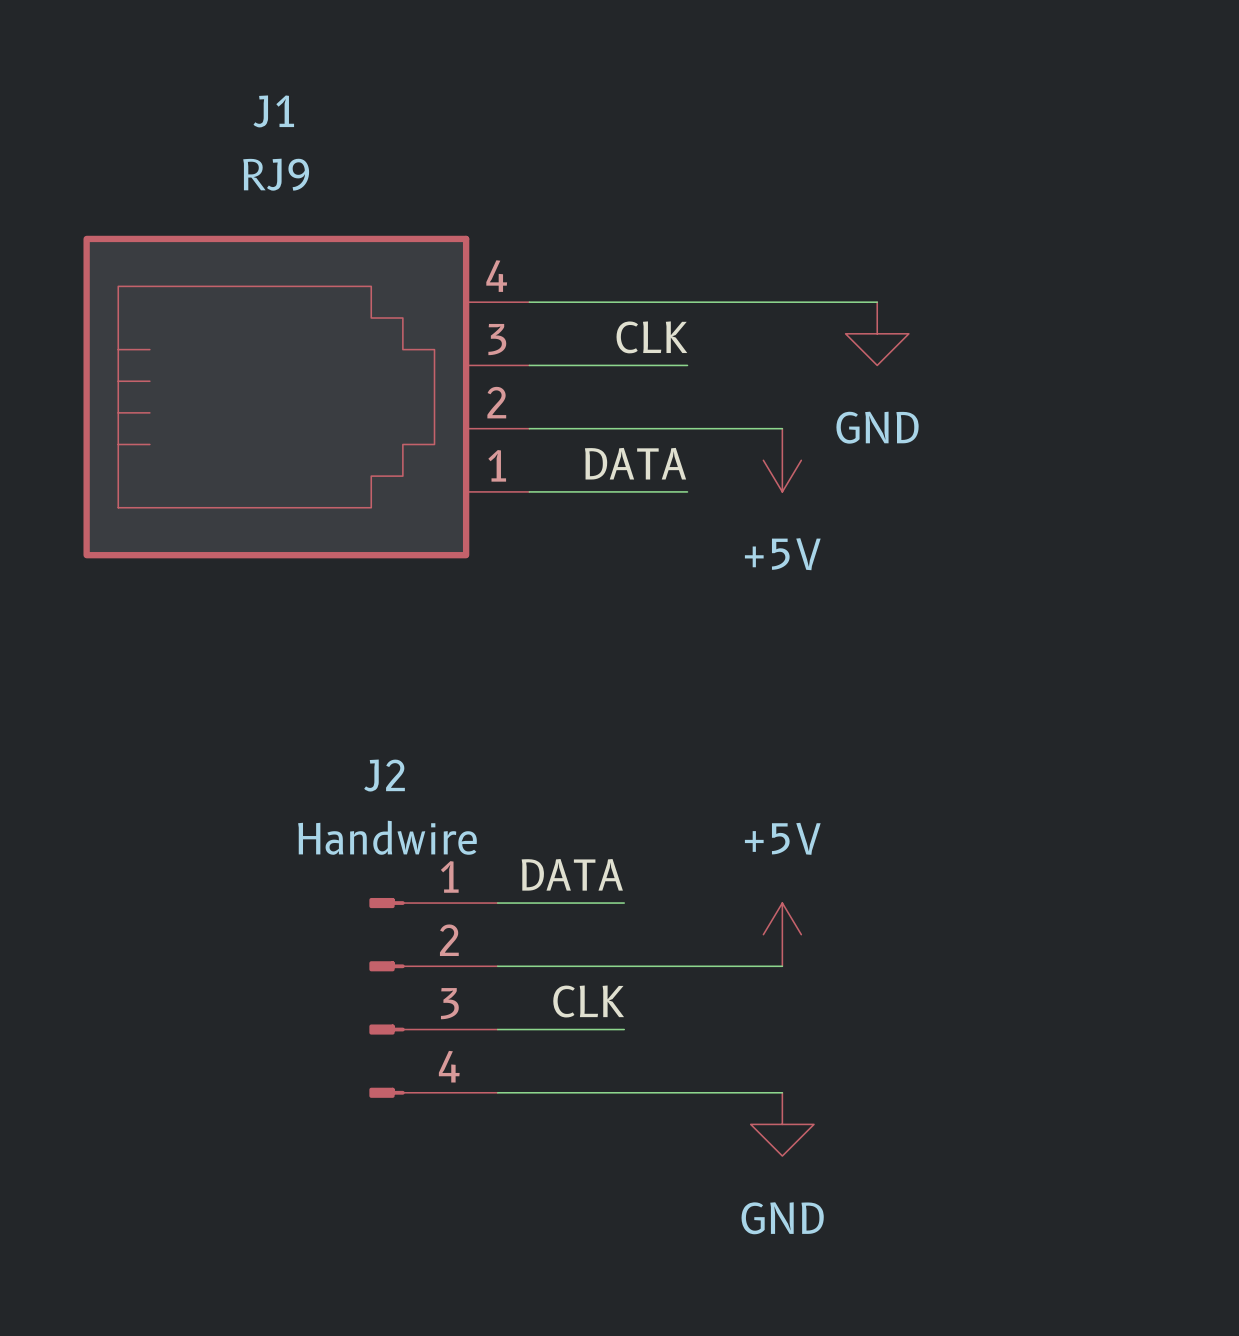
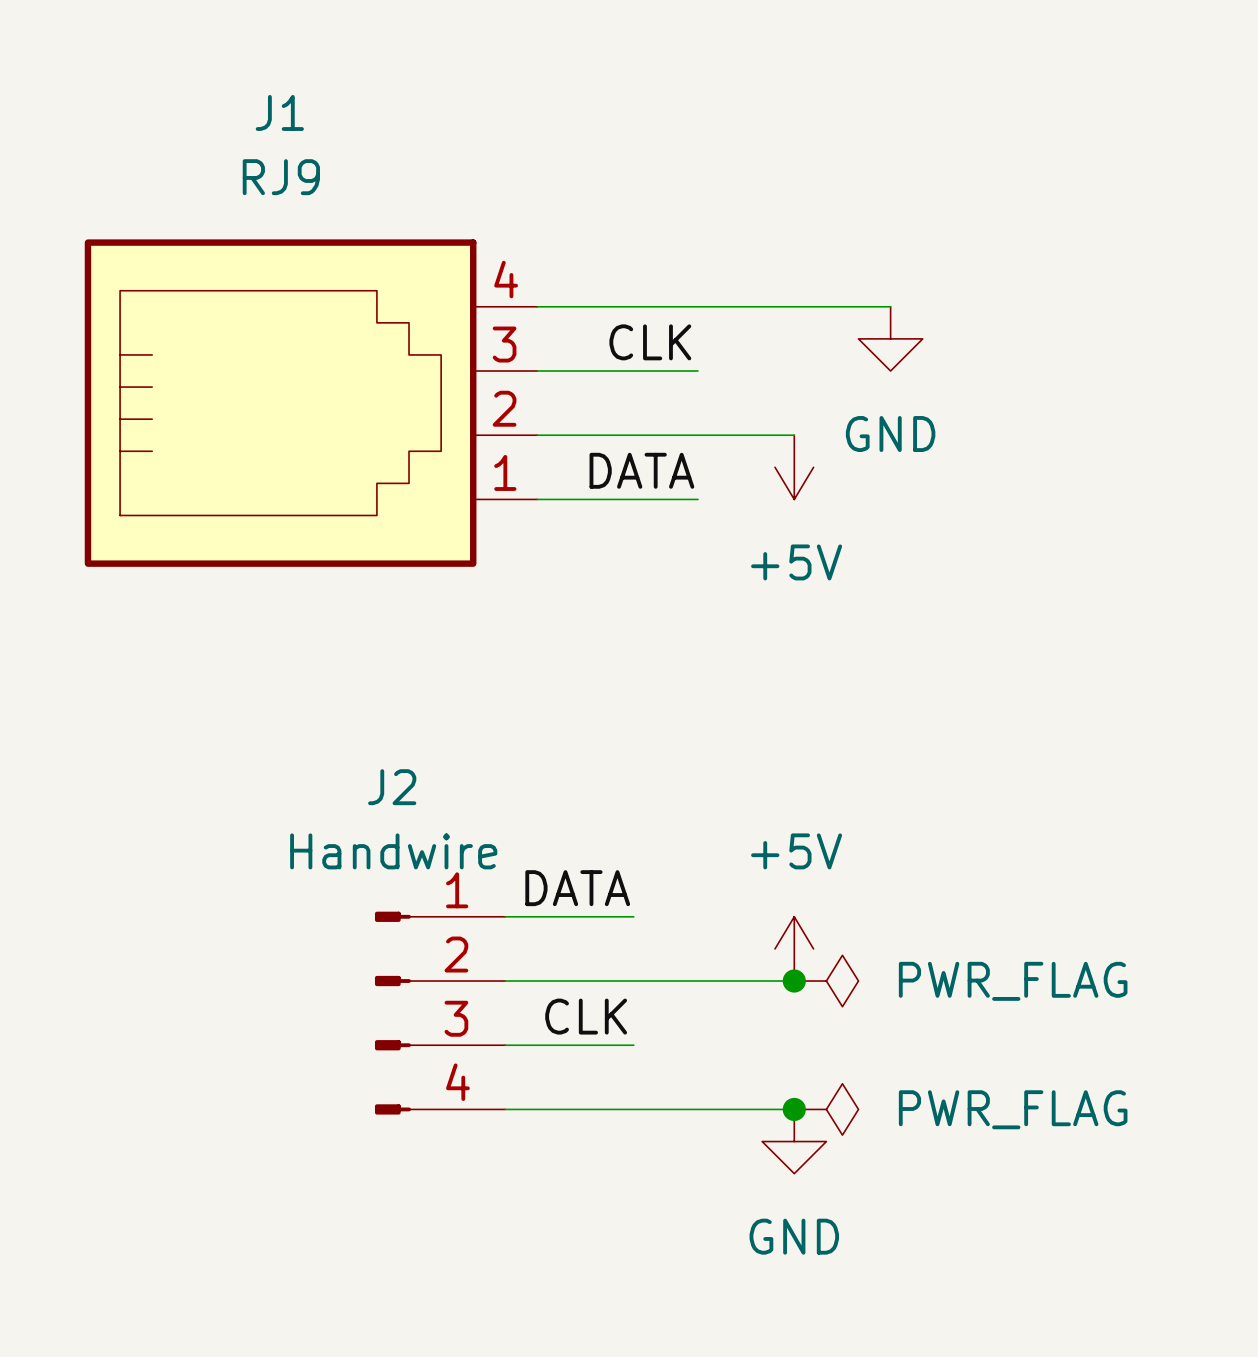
junction: none -> (794, 981)
power symbol: none -> PWR_FLAG (826, 981)
junction: none -> (794, 1109)
power symbol: none -> PWR_FLAG (826, 1109)

